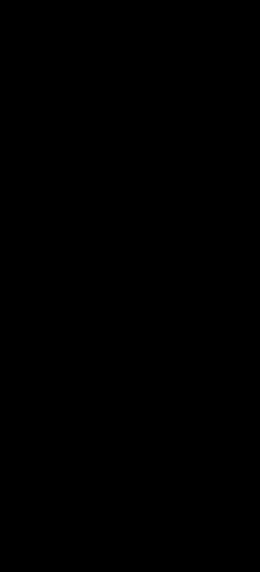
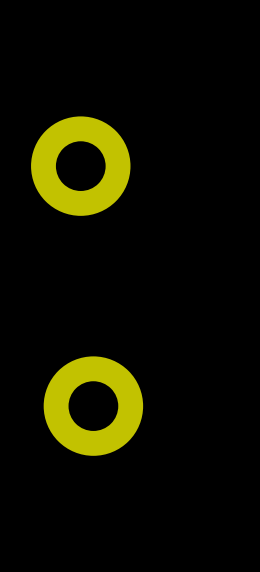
part: none -> (80, 166)
part: none -> (93, 406)

